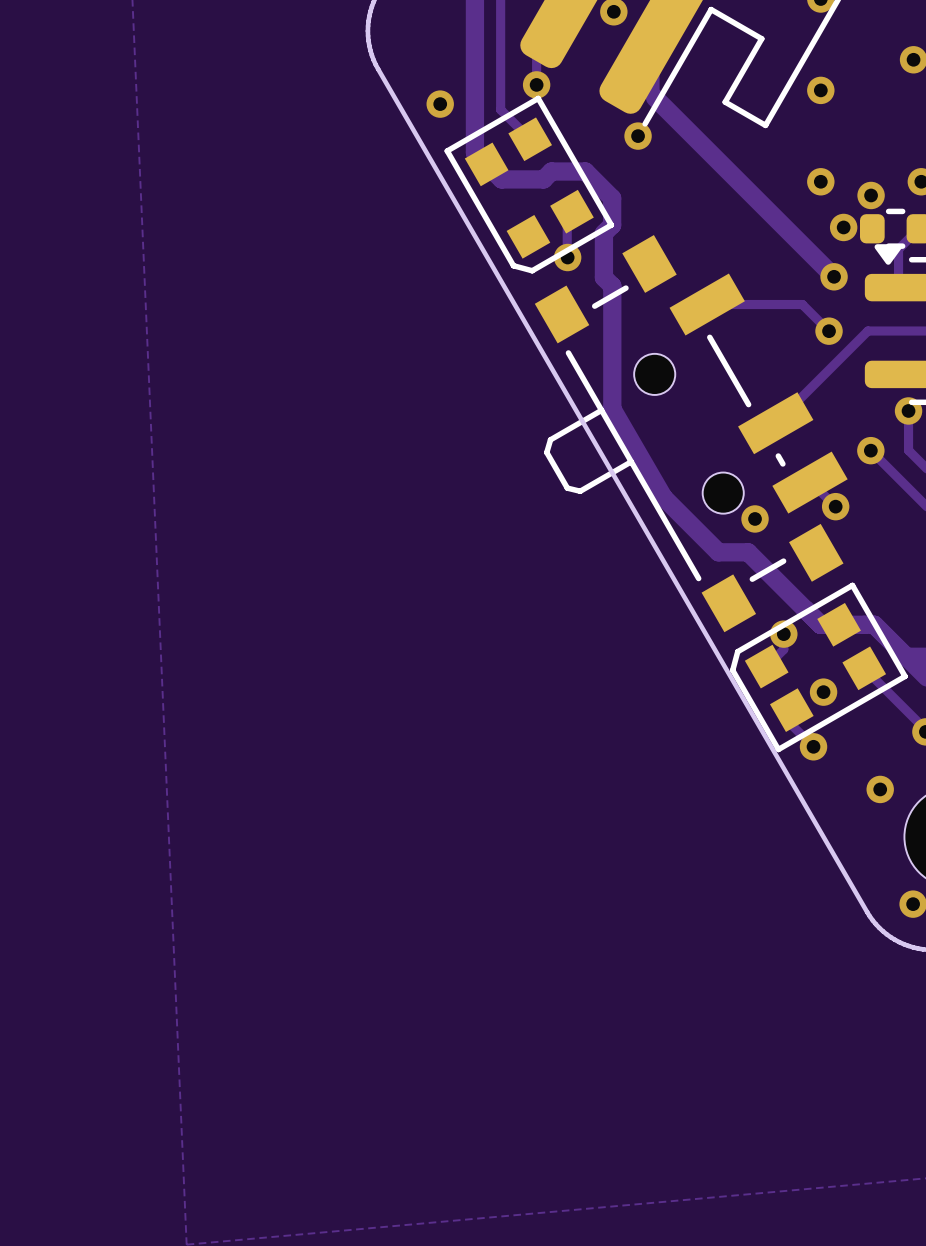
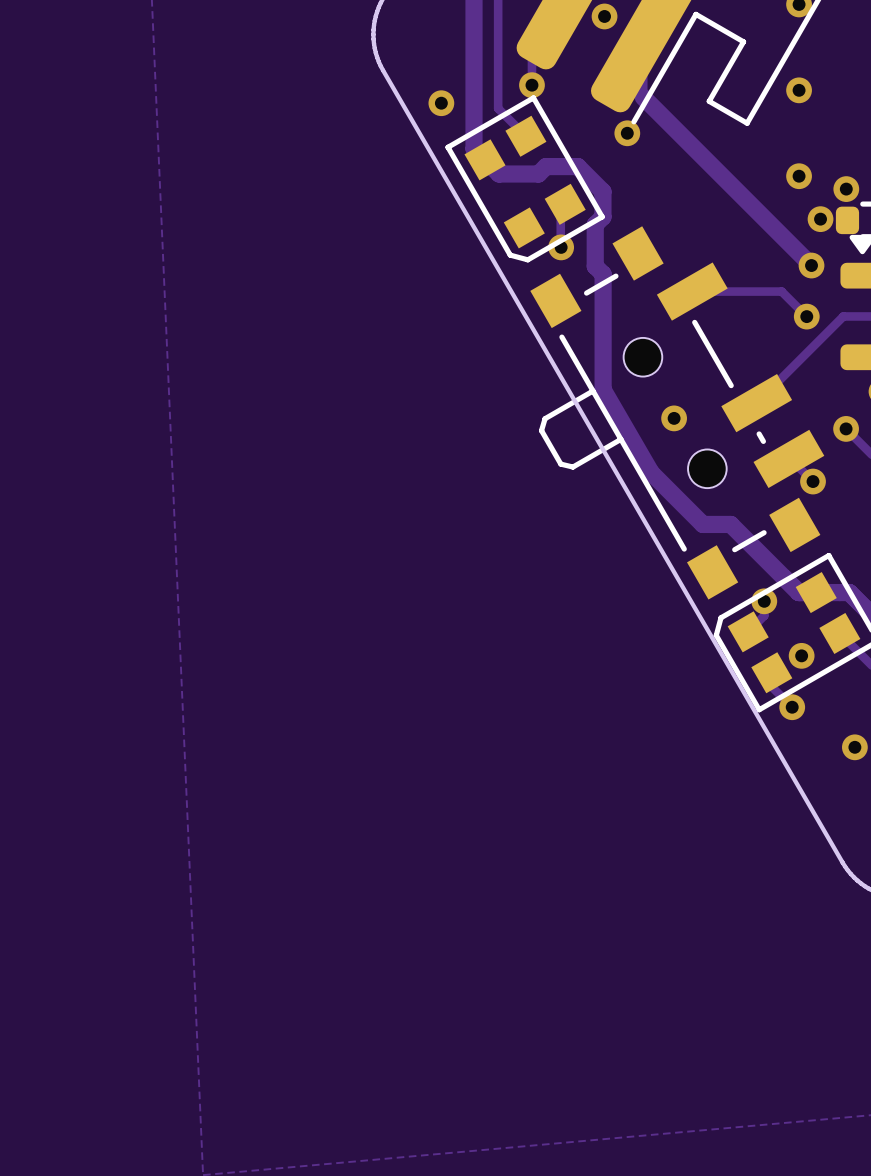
via position: (755, 518) -> (674, 418)

